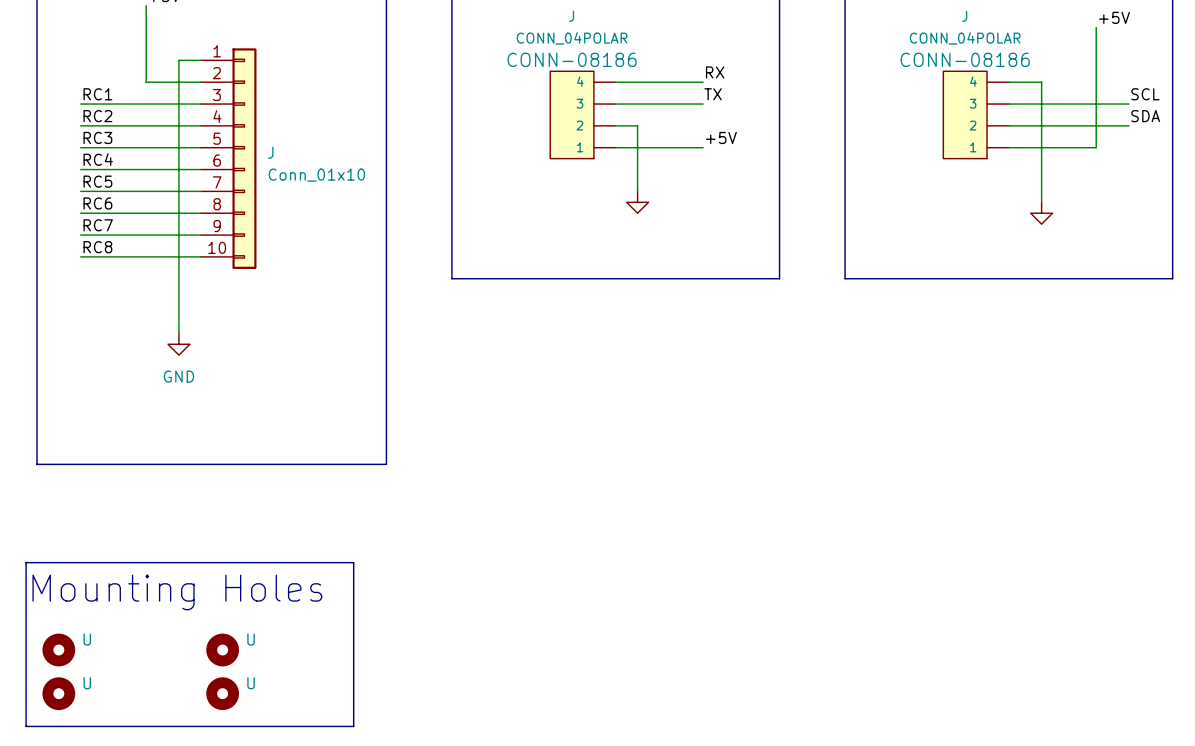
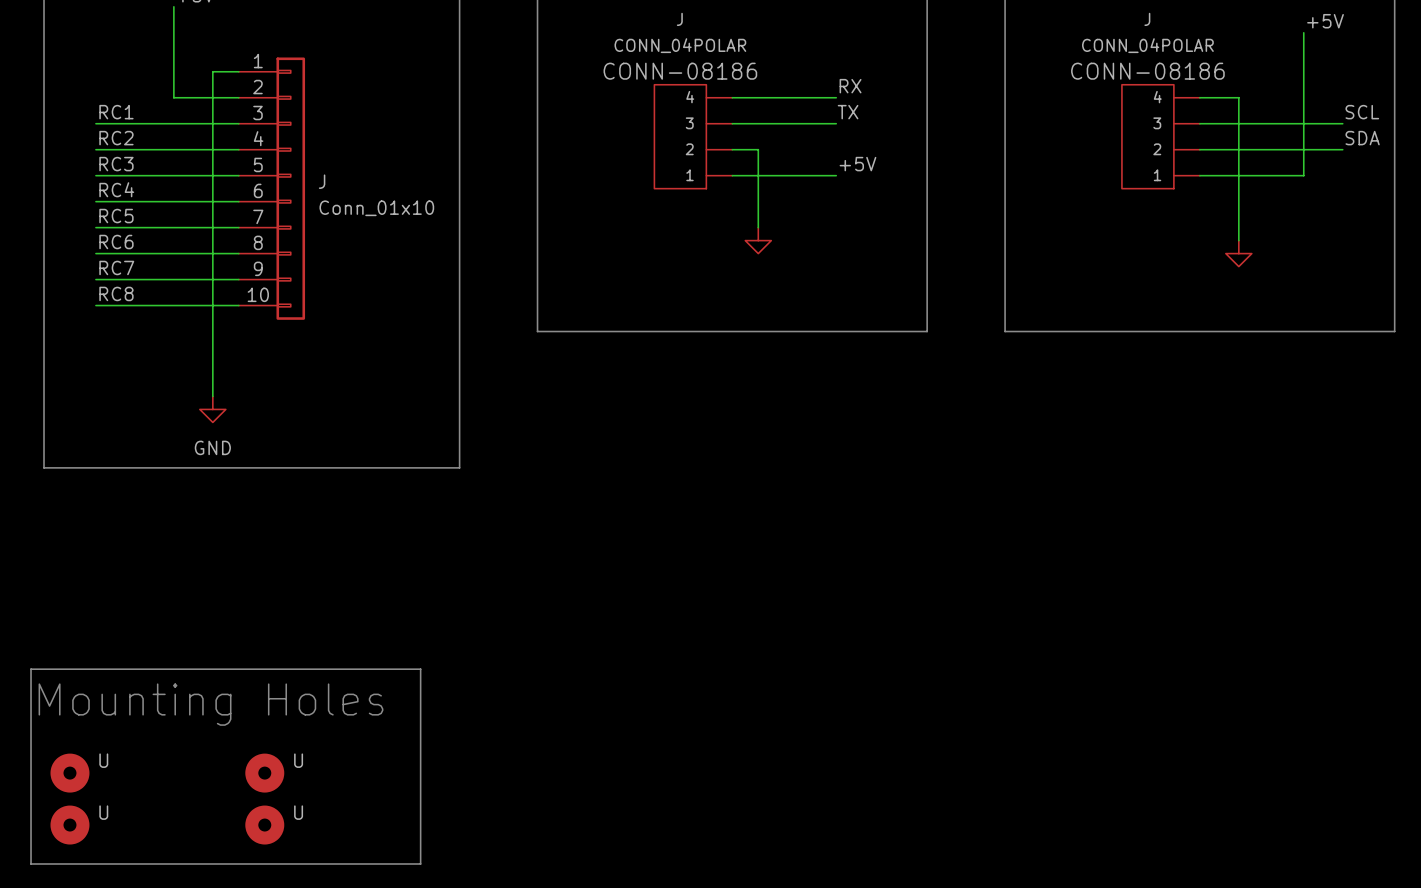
line: (37, 393) (37, 464) (386, 464) (386, 393) -> (44, 467) (459, 467)

